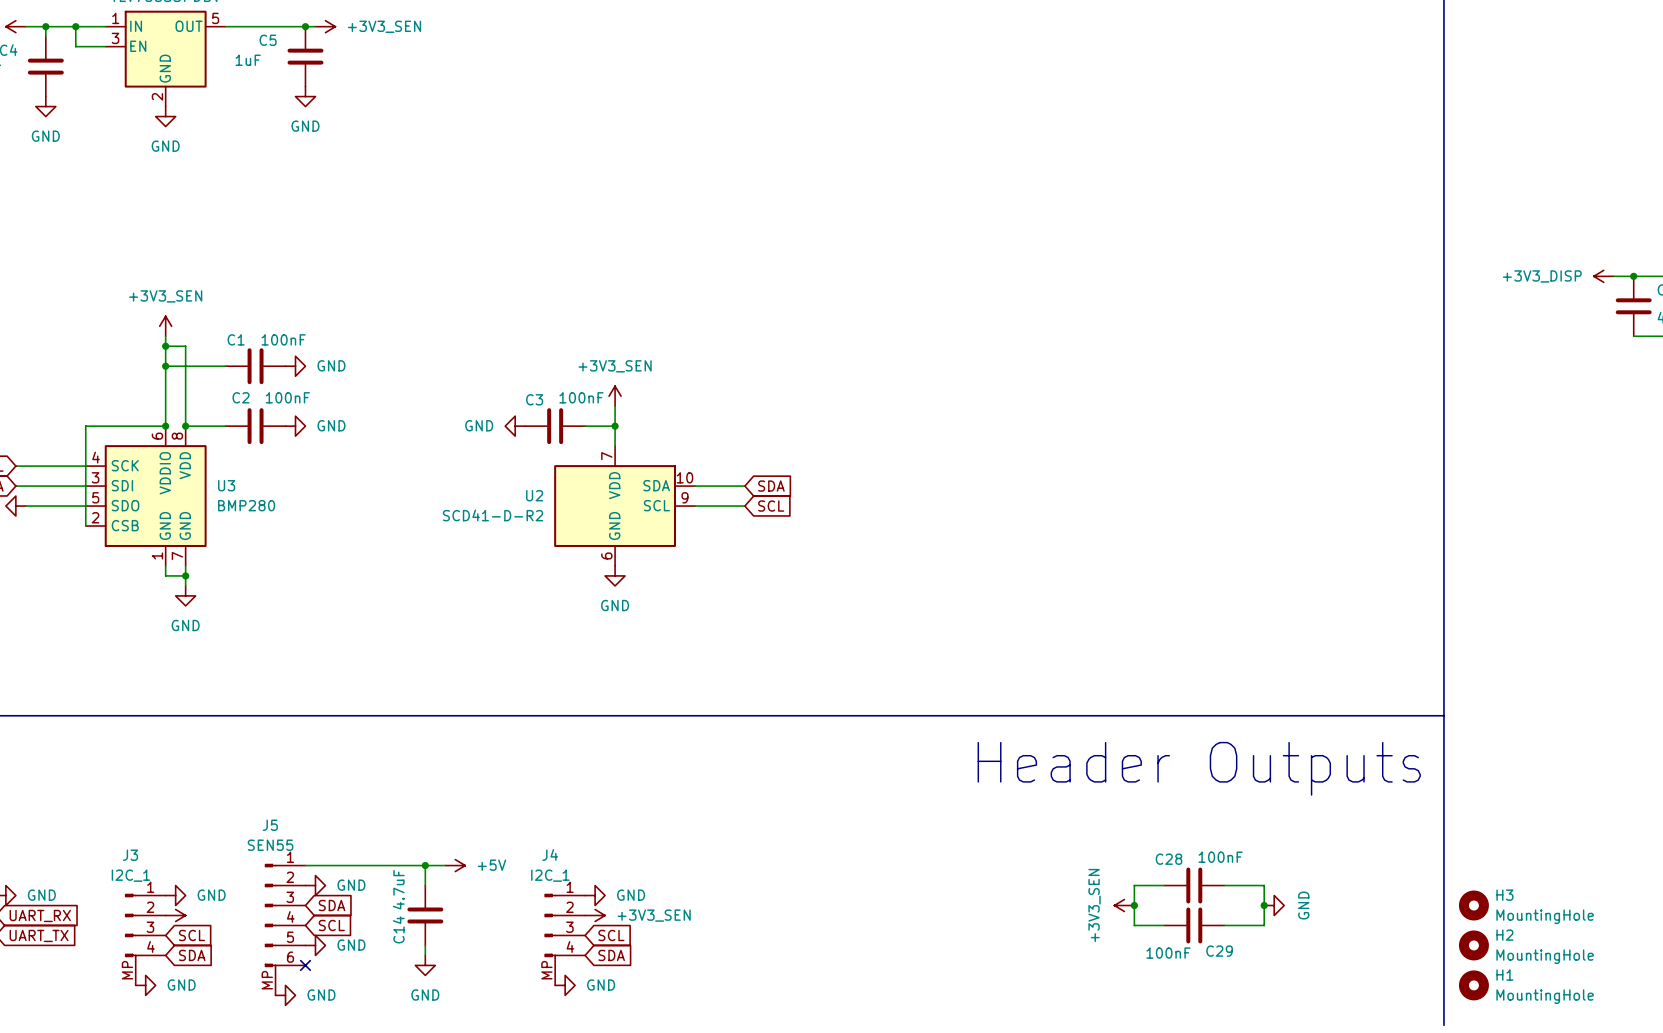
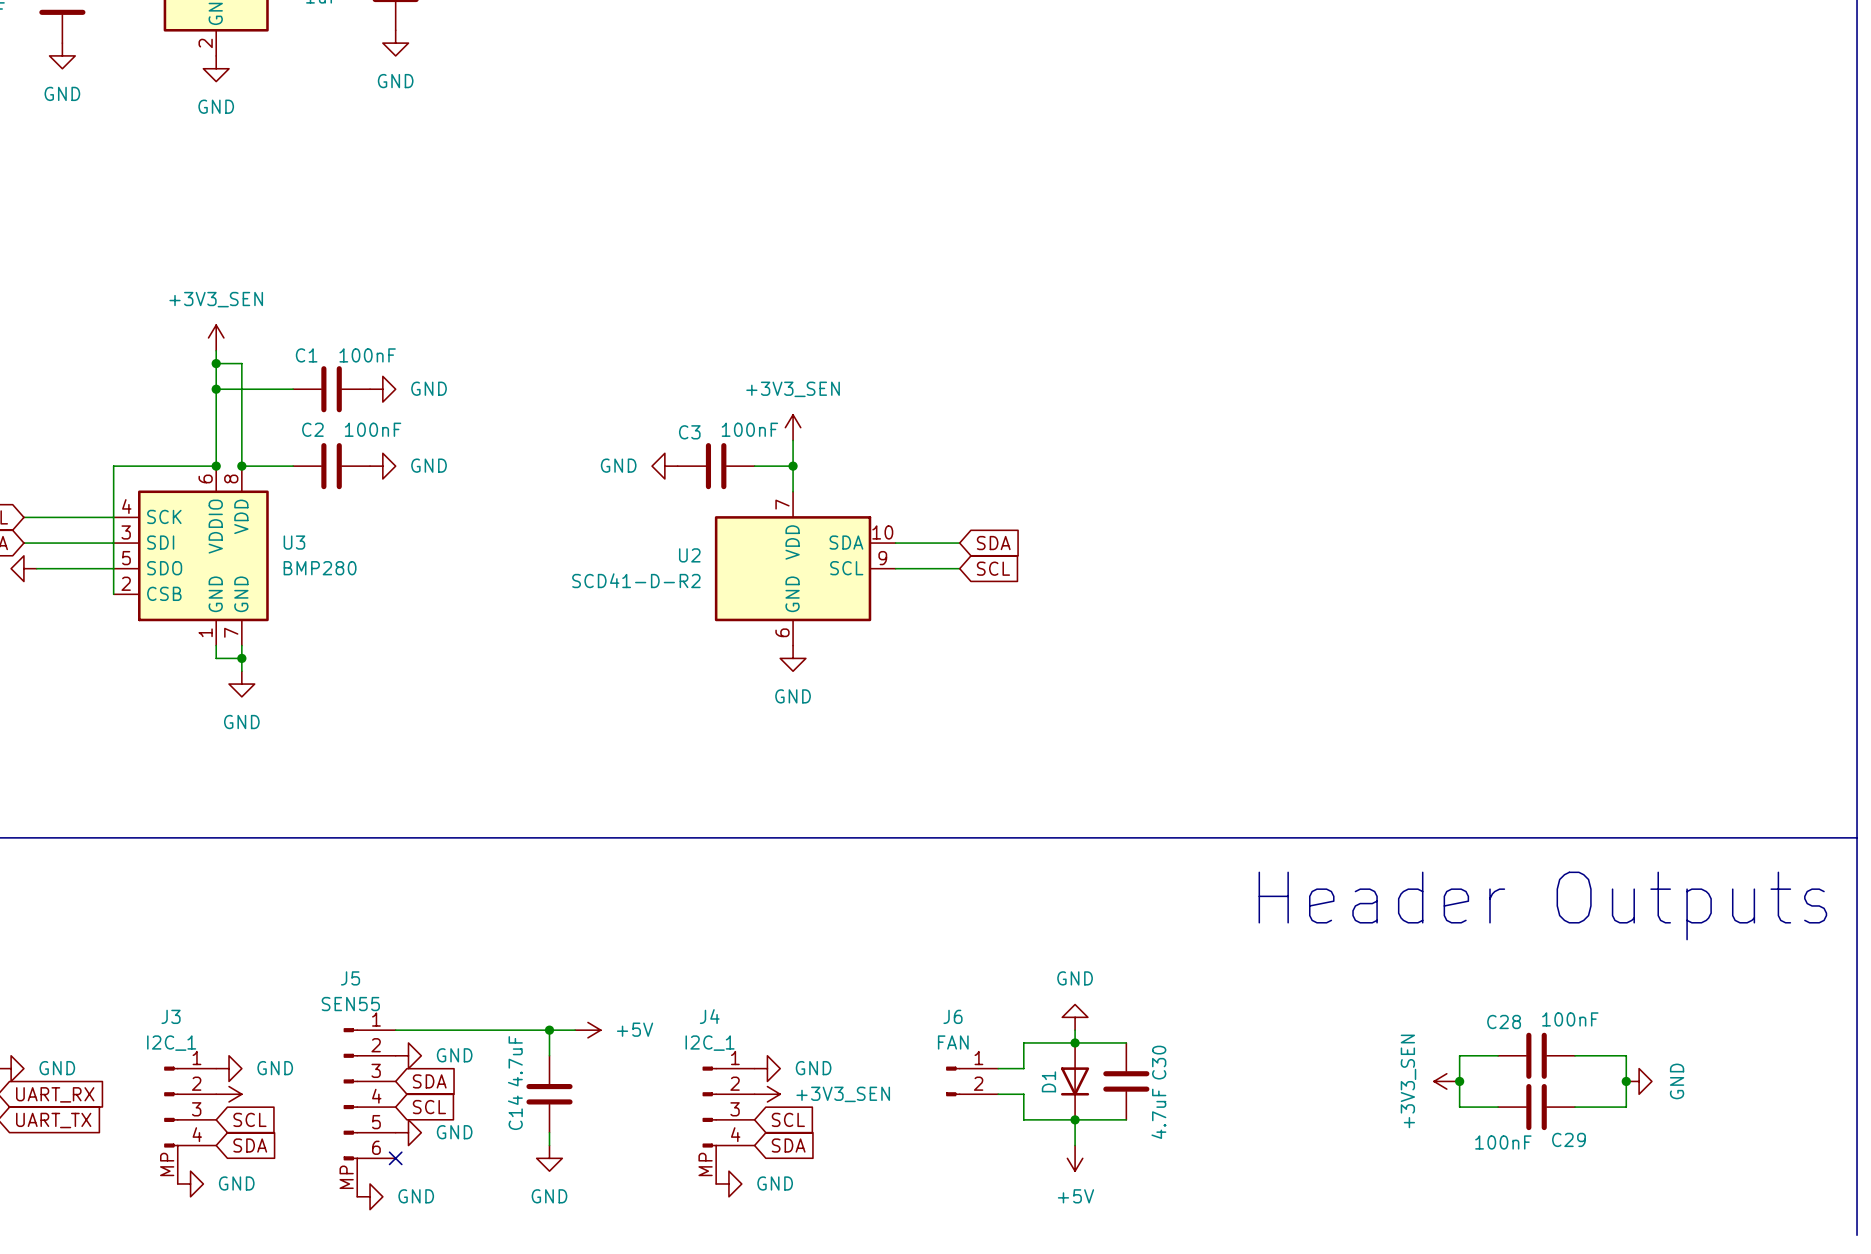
power symbol: none -> GND (1075, 1017)
wire: none -> (1075, 1030) (1075, 1042)
junction: none -> (1075, 1042)
wire: none -> (1126, 1042) (1023, 1042) (1023, 1068) (998, 1068)
J6: none -> FAN (972, 1081)
D1: none -> (1075, 1081)
C30: none -> 4.7uF (1126, 1081)
wire: none -> (998, 1094) (1023, 1094) (1023, 1119) (1126, 1119)
wire: none -> (1075, 1119) (1075, 1145)
junction: none -> (1075, 1119)
power symbol: none -> +5V (1075, 1158)

